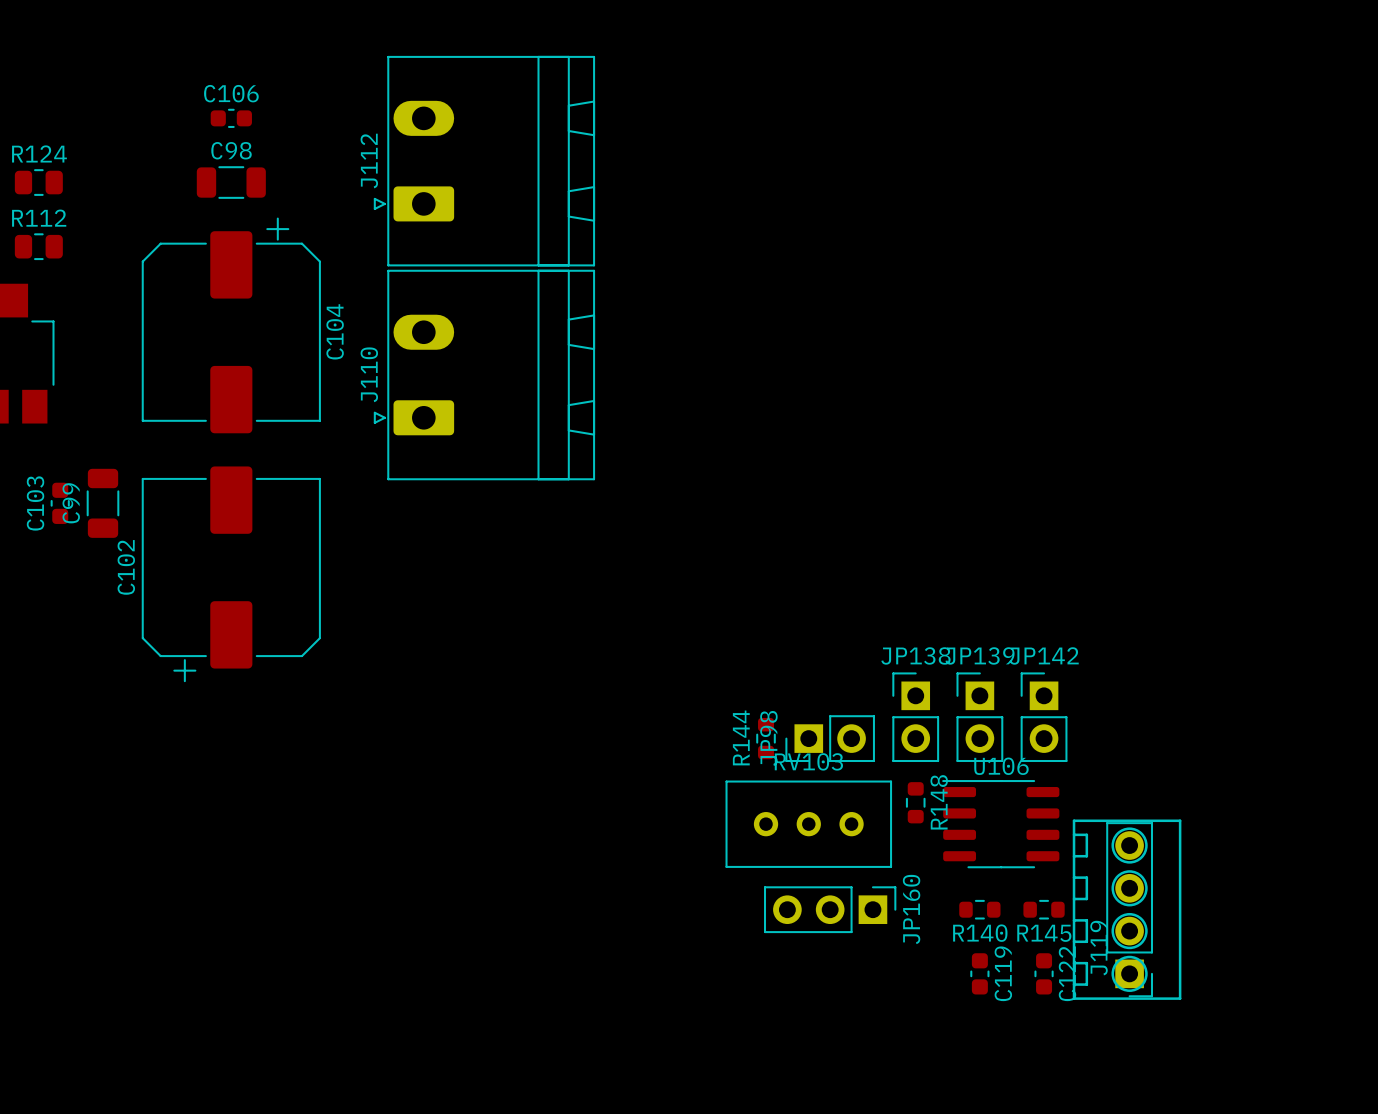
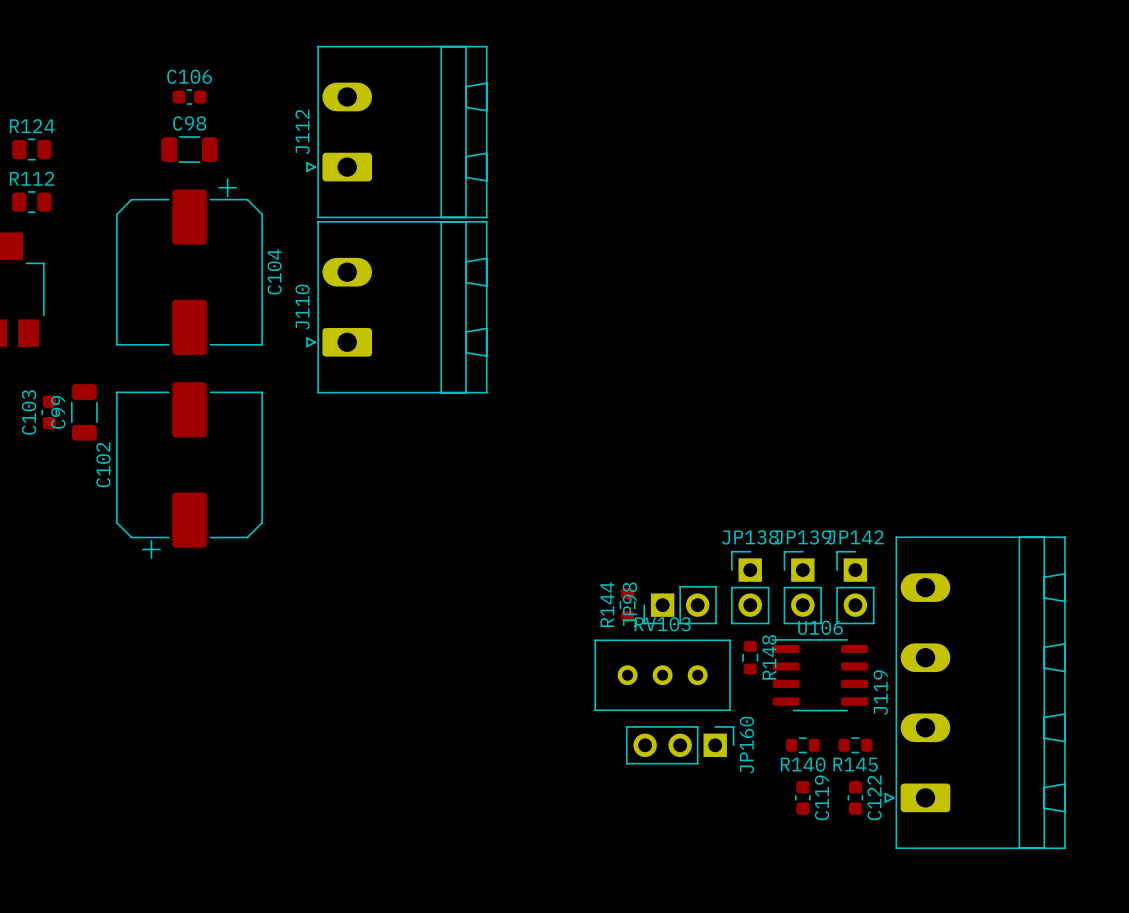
J119 footprint: [1072, 819, 1182, 1000] -> [884, 536, 1066, 850]
J119 name position: J119 (1099, 948) -> J119 (880, 692)

